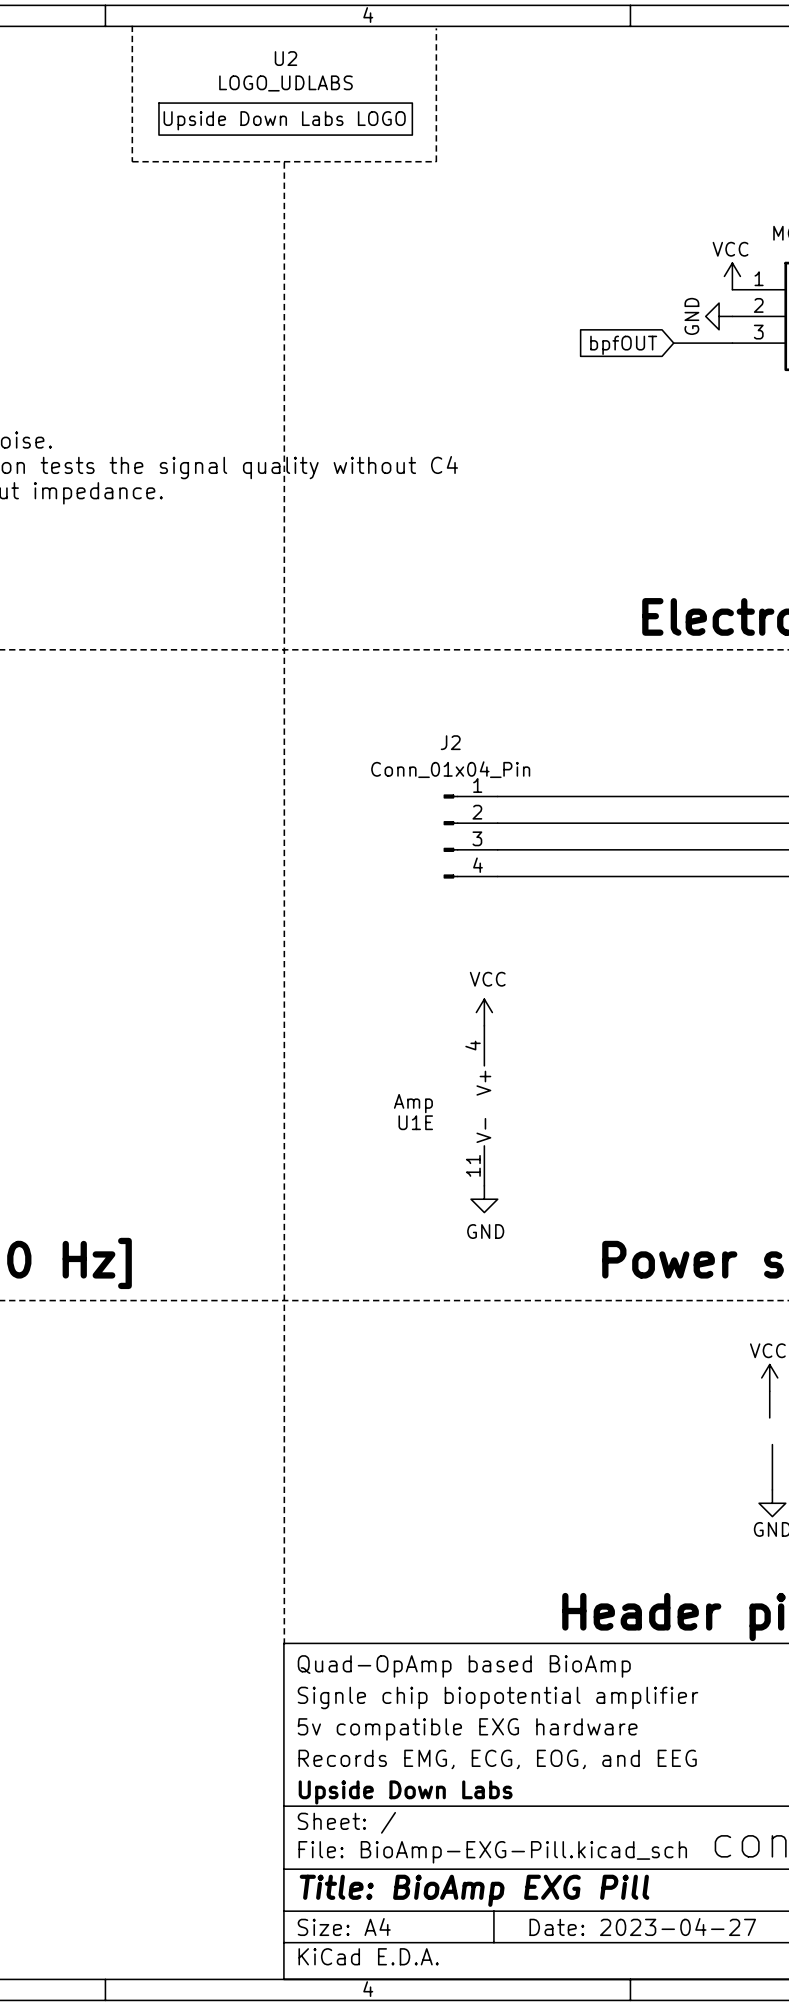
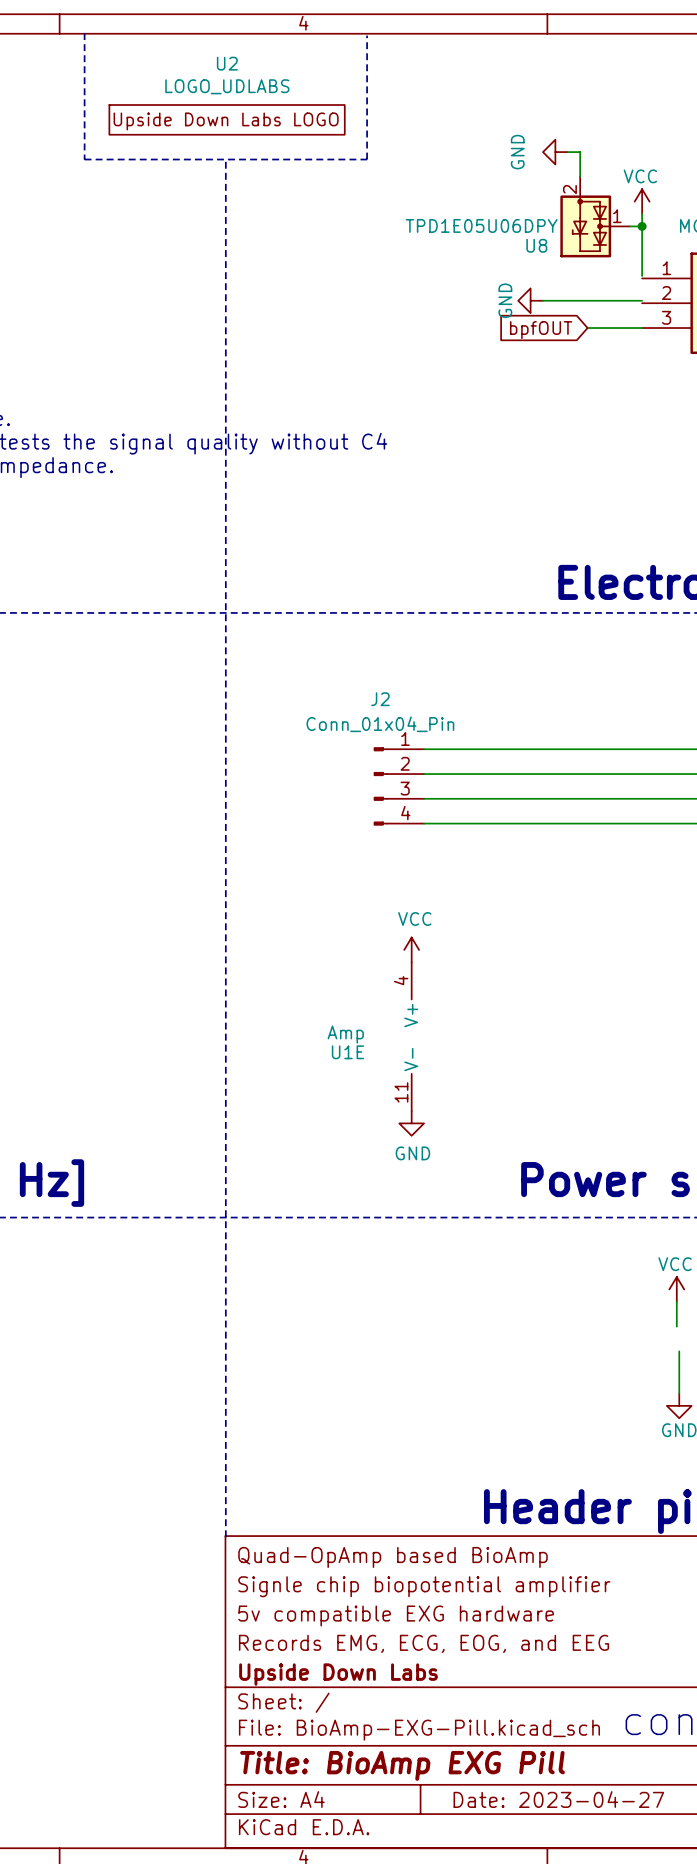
power symbol: none -> GND (555, 152)
wire: none -> (567, 152) (580, 152) (580, 176)
wire: none -> (642, 214) (642, 275)
U8: none -> TPD1E05U06DPY (595, 217)
wire: none -> (629, 226) (642, 226)
junction: none -> (642, 226)
power symbol position: VCC (732, 276) -> VCC (642, 201)
power symbol: none -> GND (530, 300)
wire: none -> (542, 300) (642, 300)
power symbol: GND (719, 316) -> none

